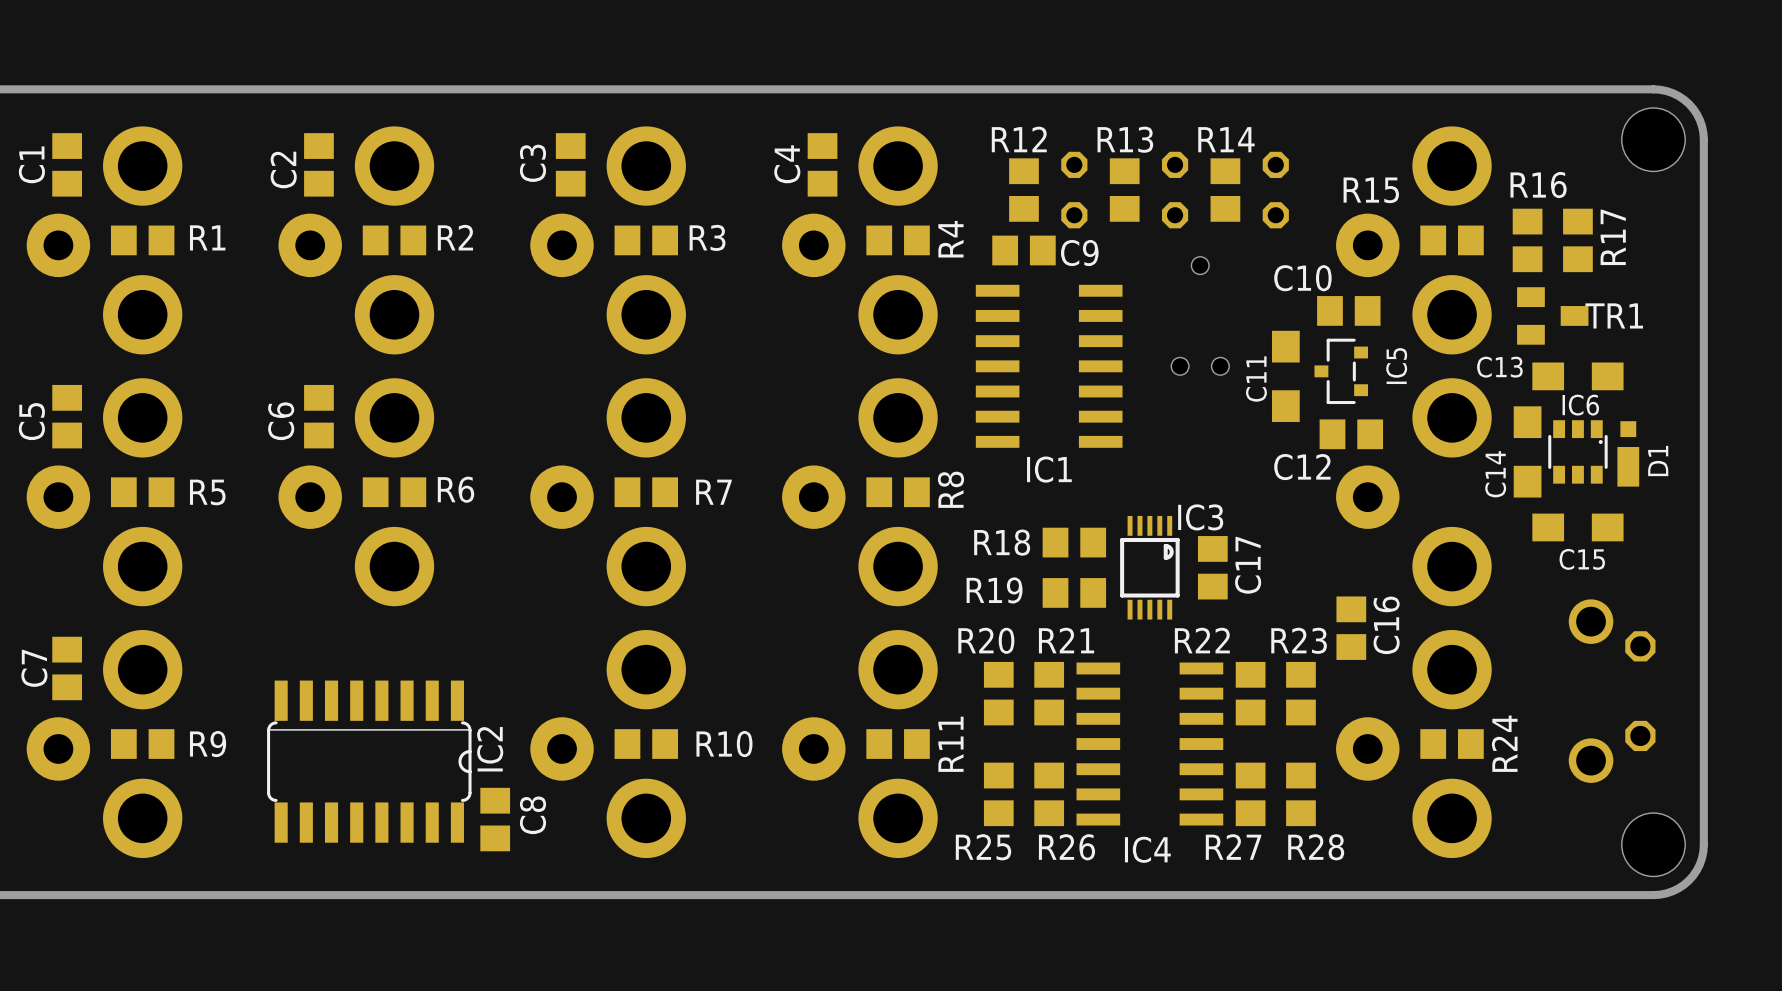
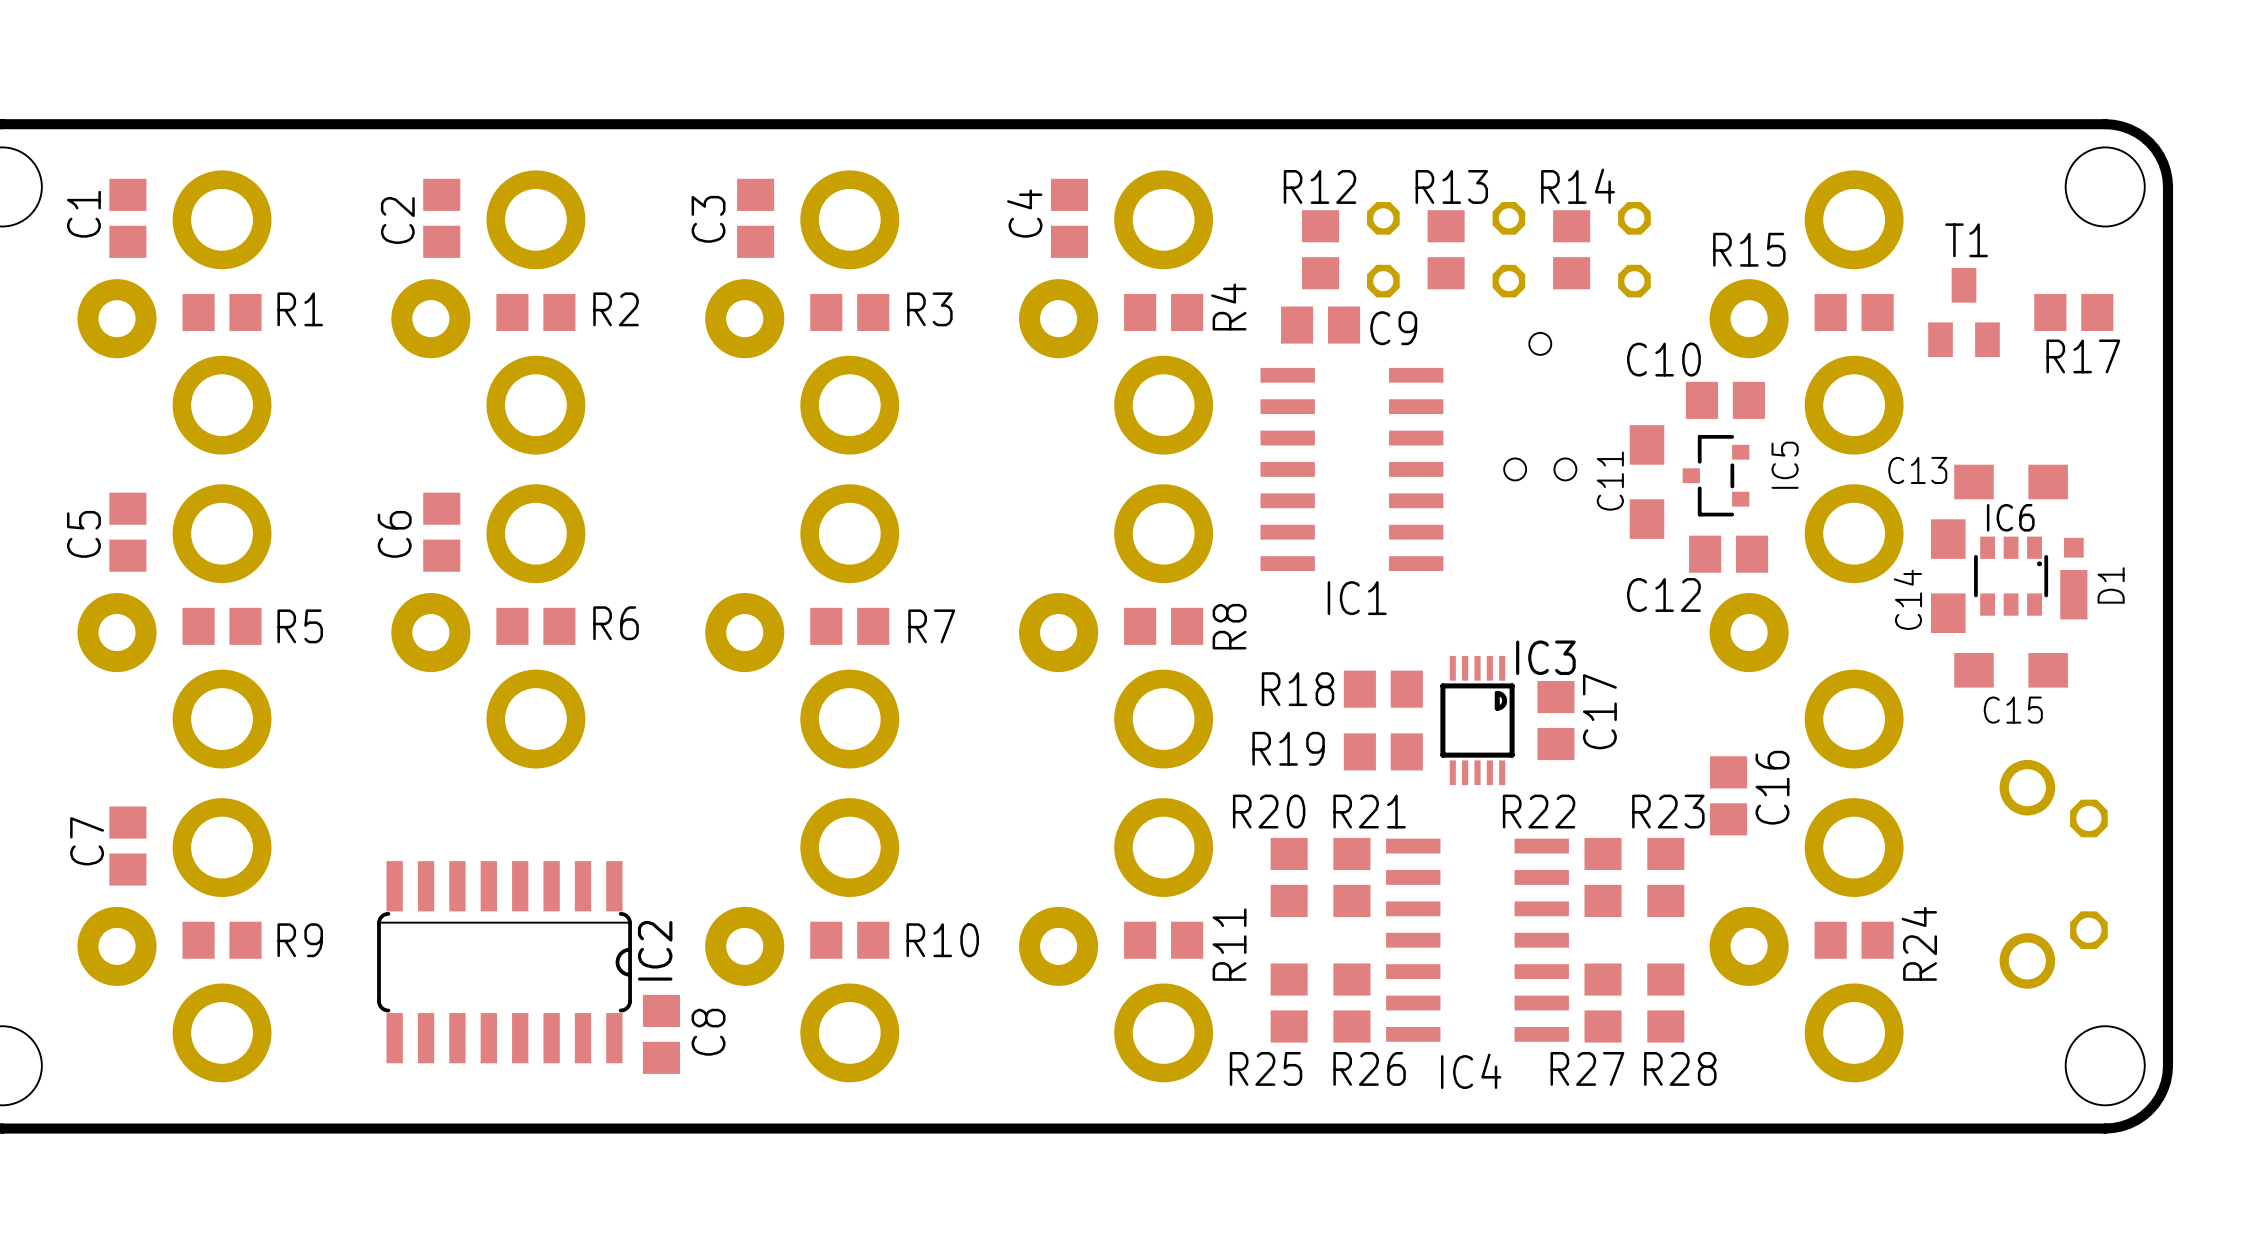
R16: (1527, 240) -> none
T1: none -> (1963, 312)
R17 rotation: 0° (1577, 240) -> 90° clockwise (2073, 312)
R17 position: (1577, 240) -> (2073, 312)
TR1: (1552, 315) -> none

